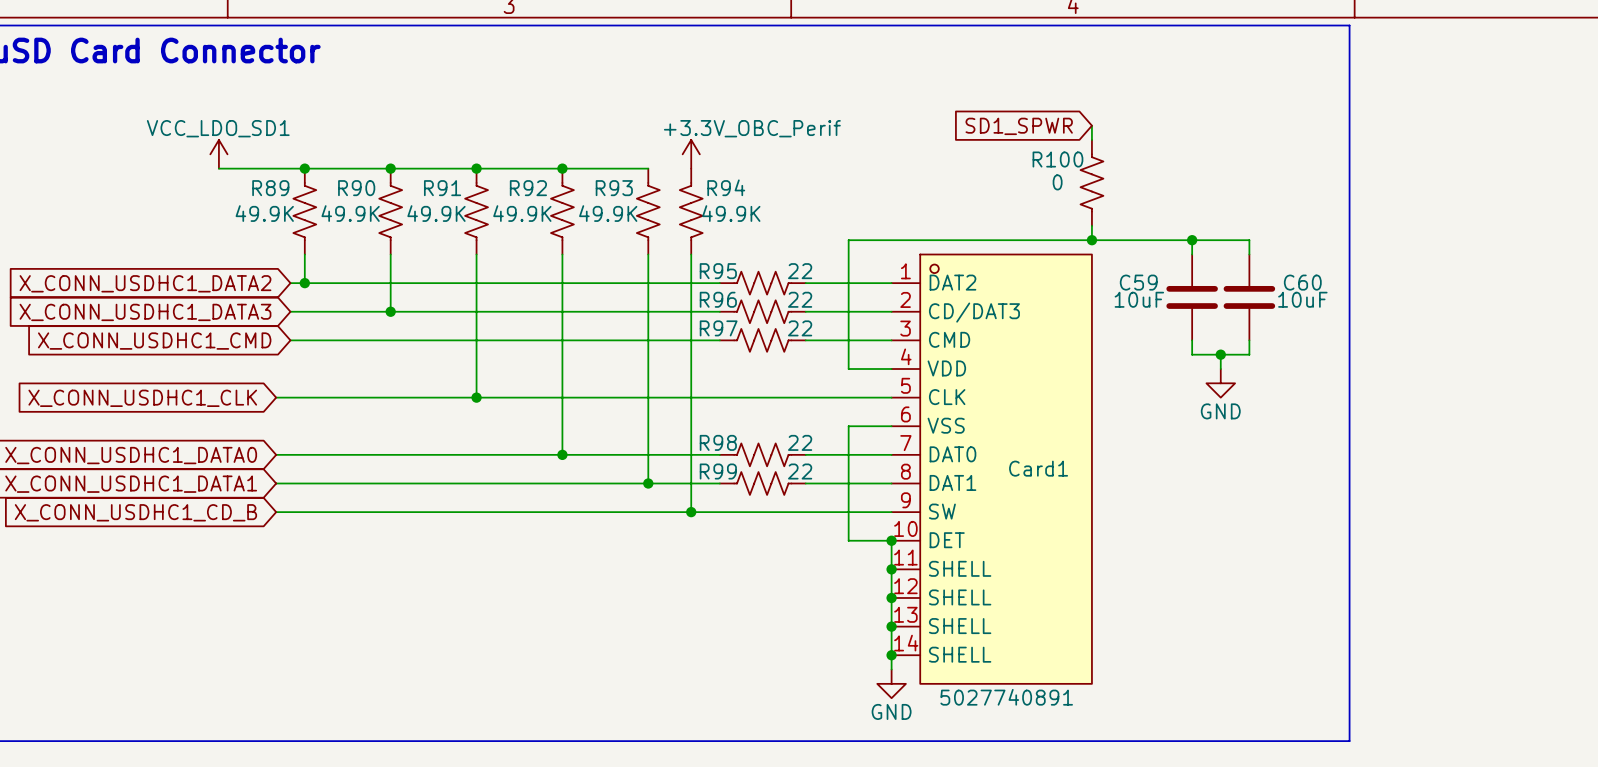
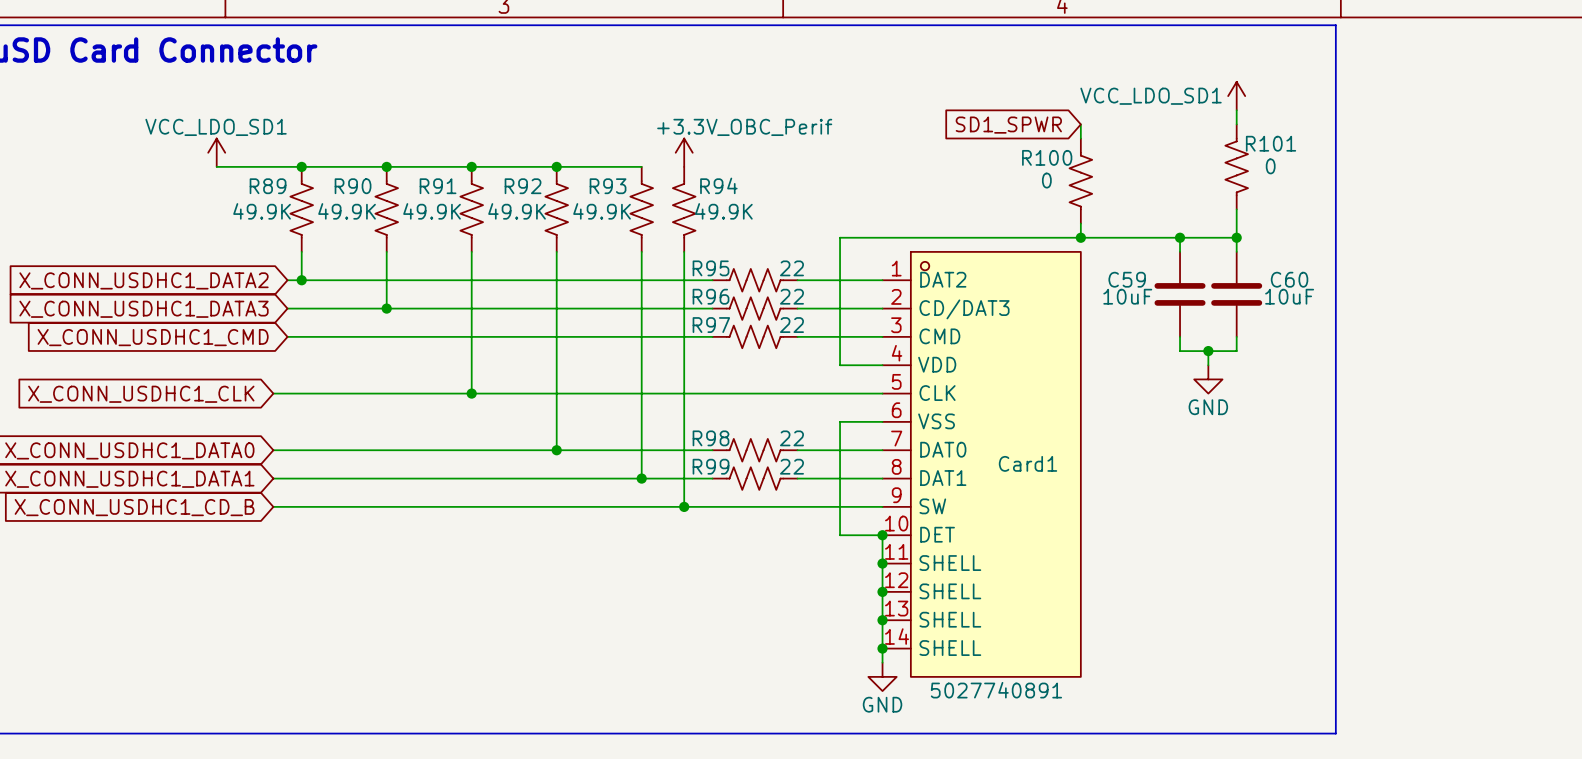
power symbol: none -> VCC_LDO_SD1 (1236, 96)
wire: none -> (1236, 110) (1236, 124)
R101: none -> 0 (1236, 166)
wire: none -> (1236, 209) (1236, 237)
junction: none -> (1236, 237)

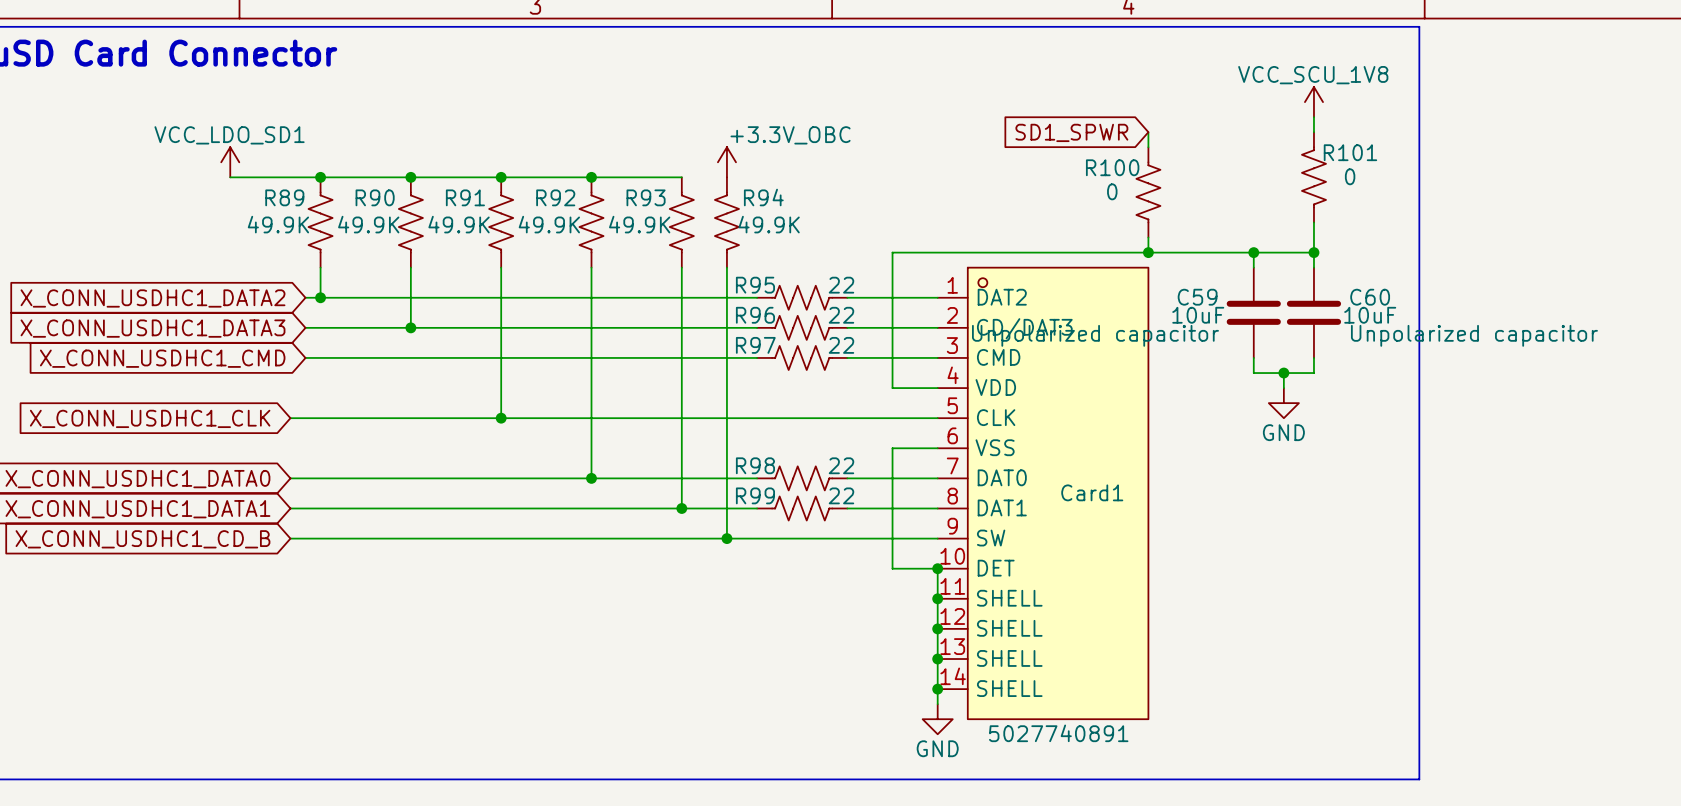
power symbol: VCC_LDO_SD1 (1236, 96) -> VCC_SCU_1V8 (1313, 102)
power symbol: +3.3V_OBC_Perif (684, 152) -> +3.3V_OBC (726, 162)
C59 text: none -> Unpolarized capacitor (1095, 335)
C60 text: none -> Unpolarized capacitor (1474, 335)

